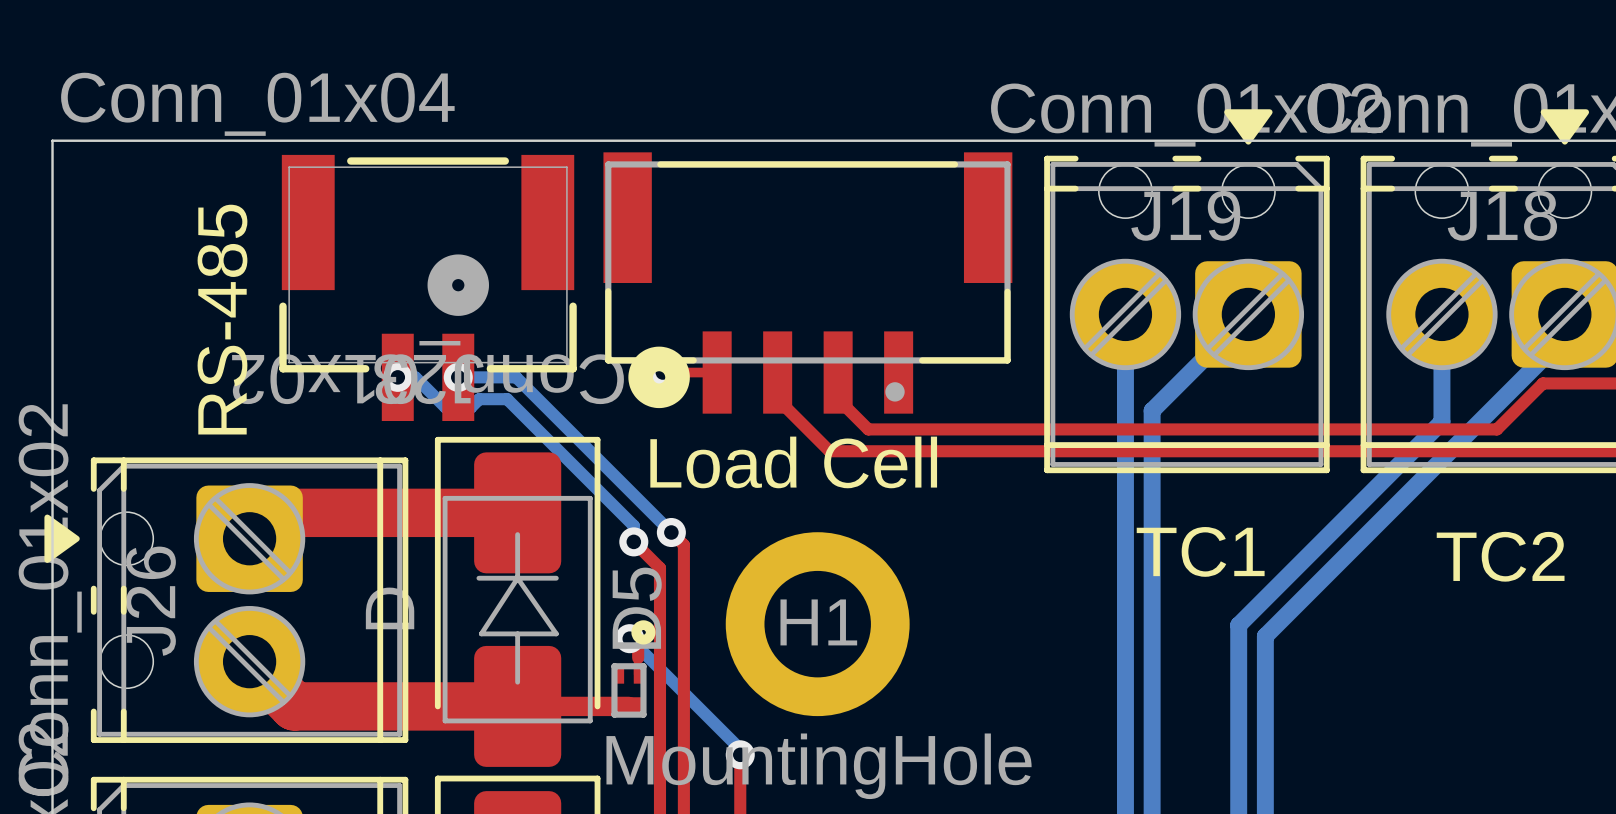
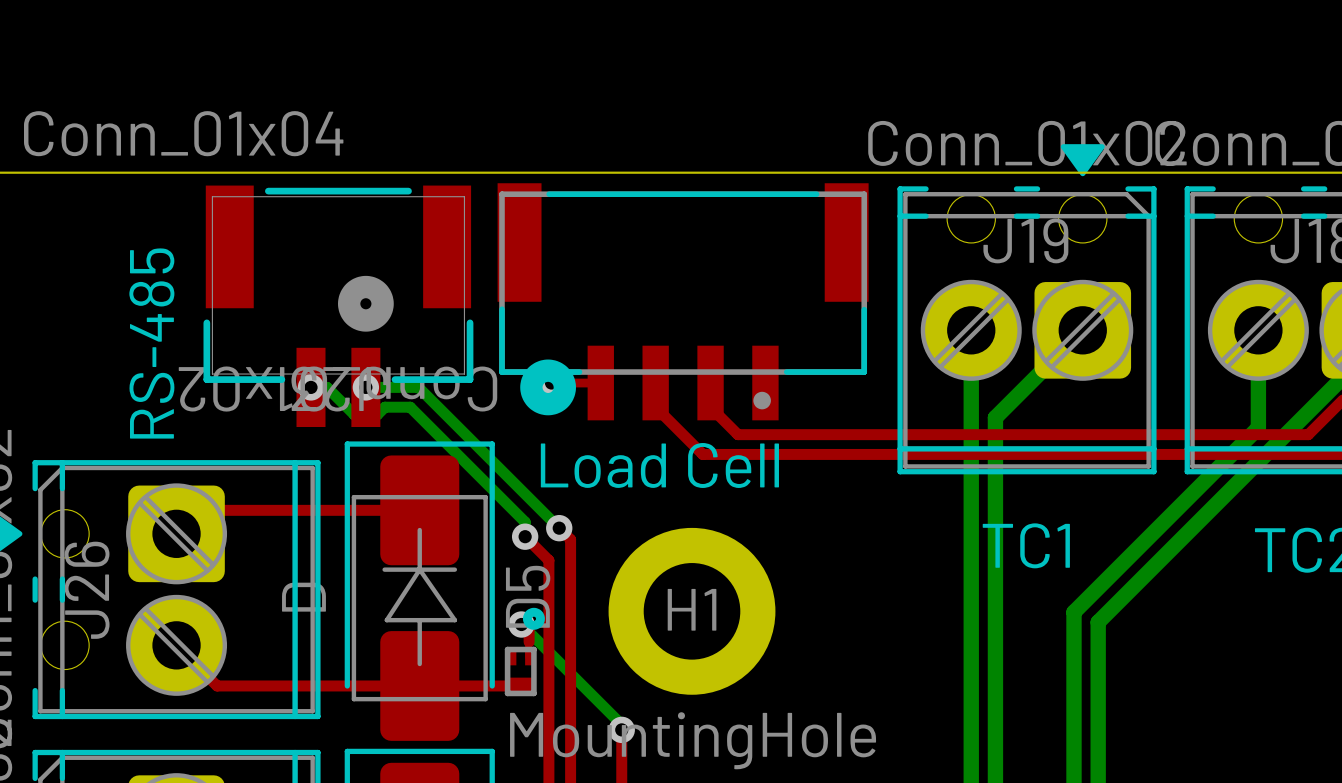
top track width: thick (517, 512) (275, 512) (249, 538) -> thin (419, 510) (200, 510) (176, 533)
top track width: thick (249, 661) (294, 706) (628, 706) -> thin (176, 645) (217, 685) (520, 685)

